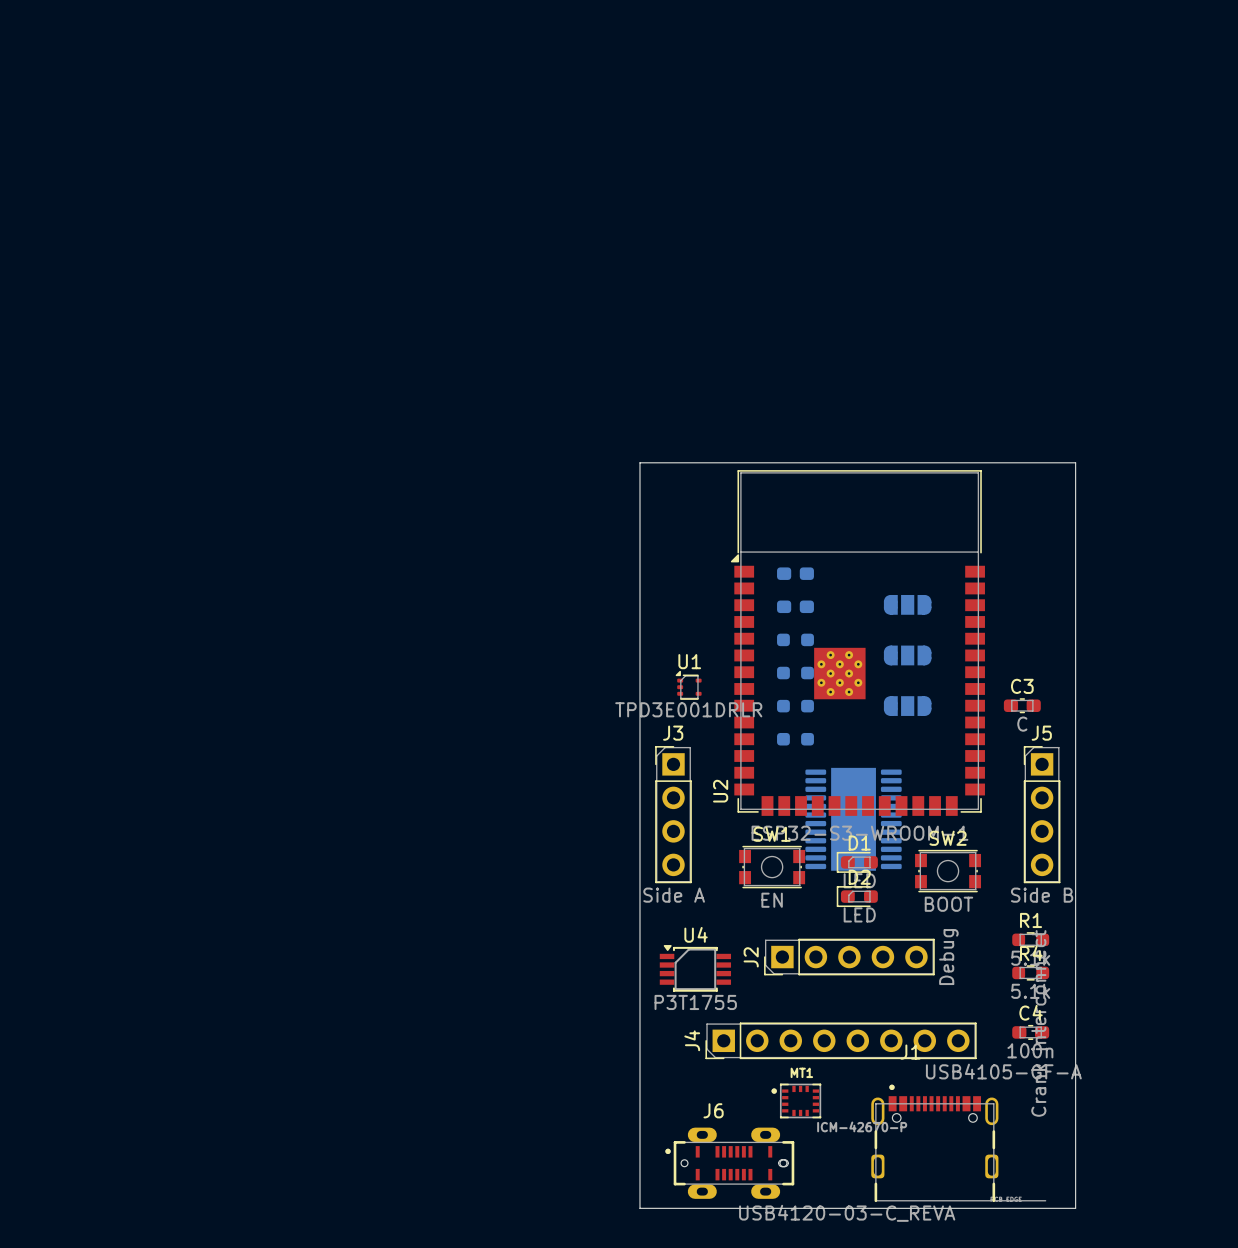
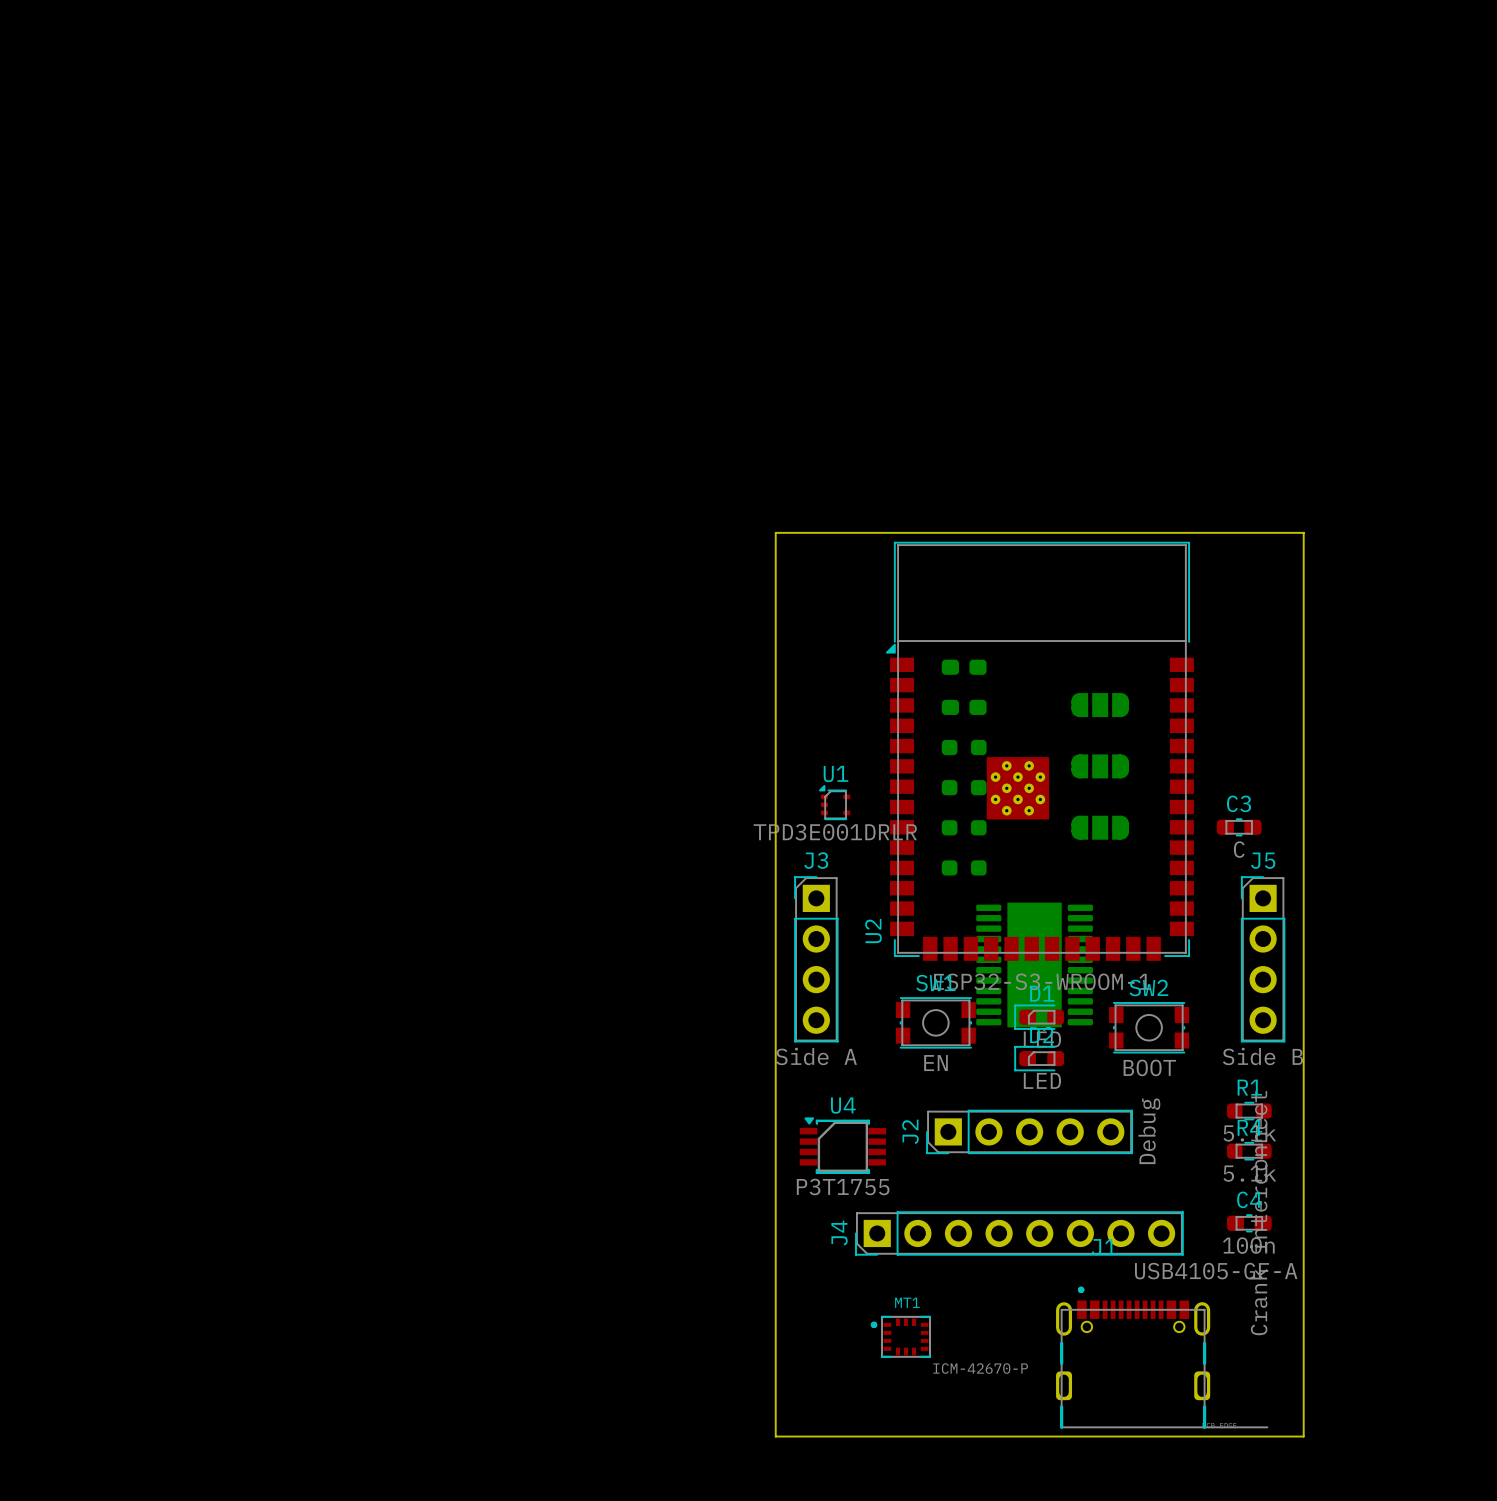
MT1 position: (796, 1100) -> (900, 1336)
J6: USB4120-03-C_REVA (729, 1163) -> none

